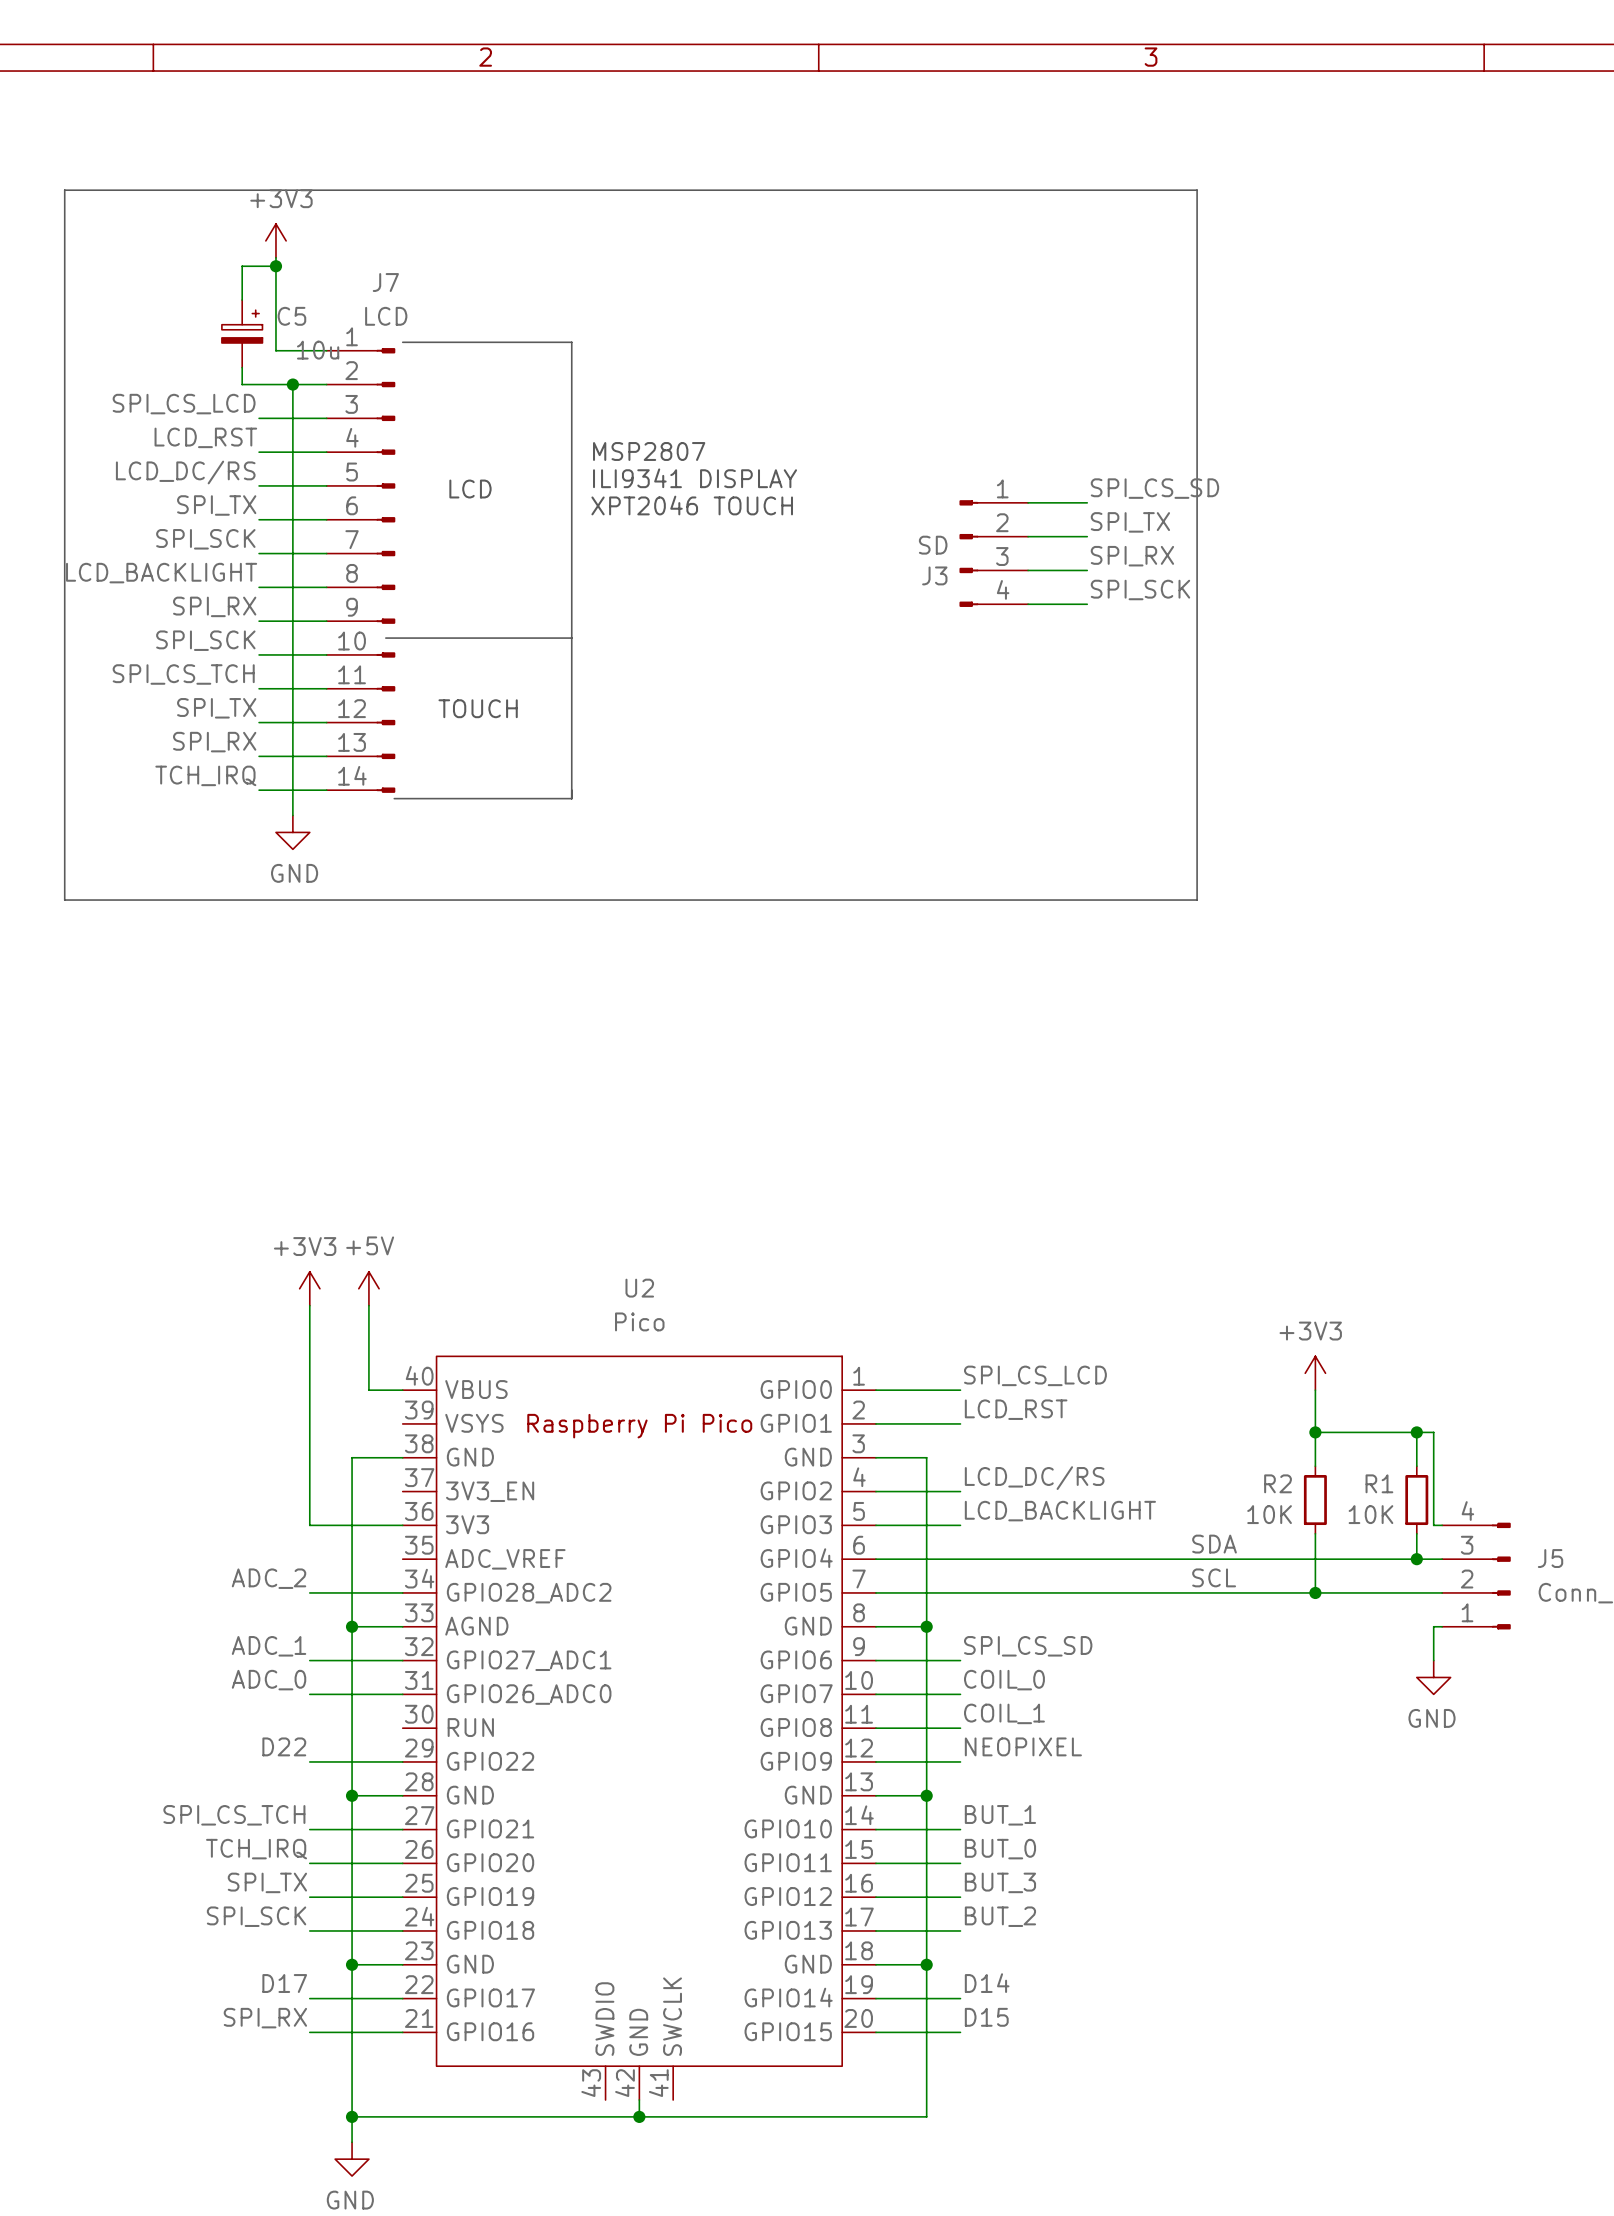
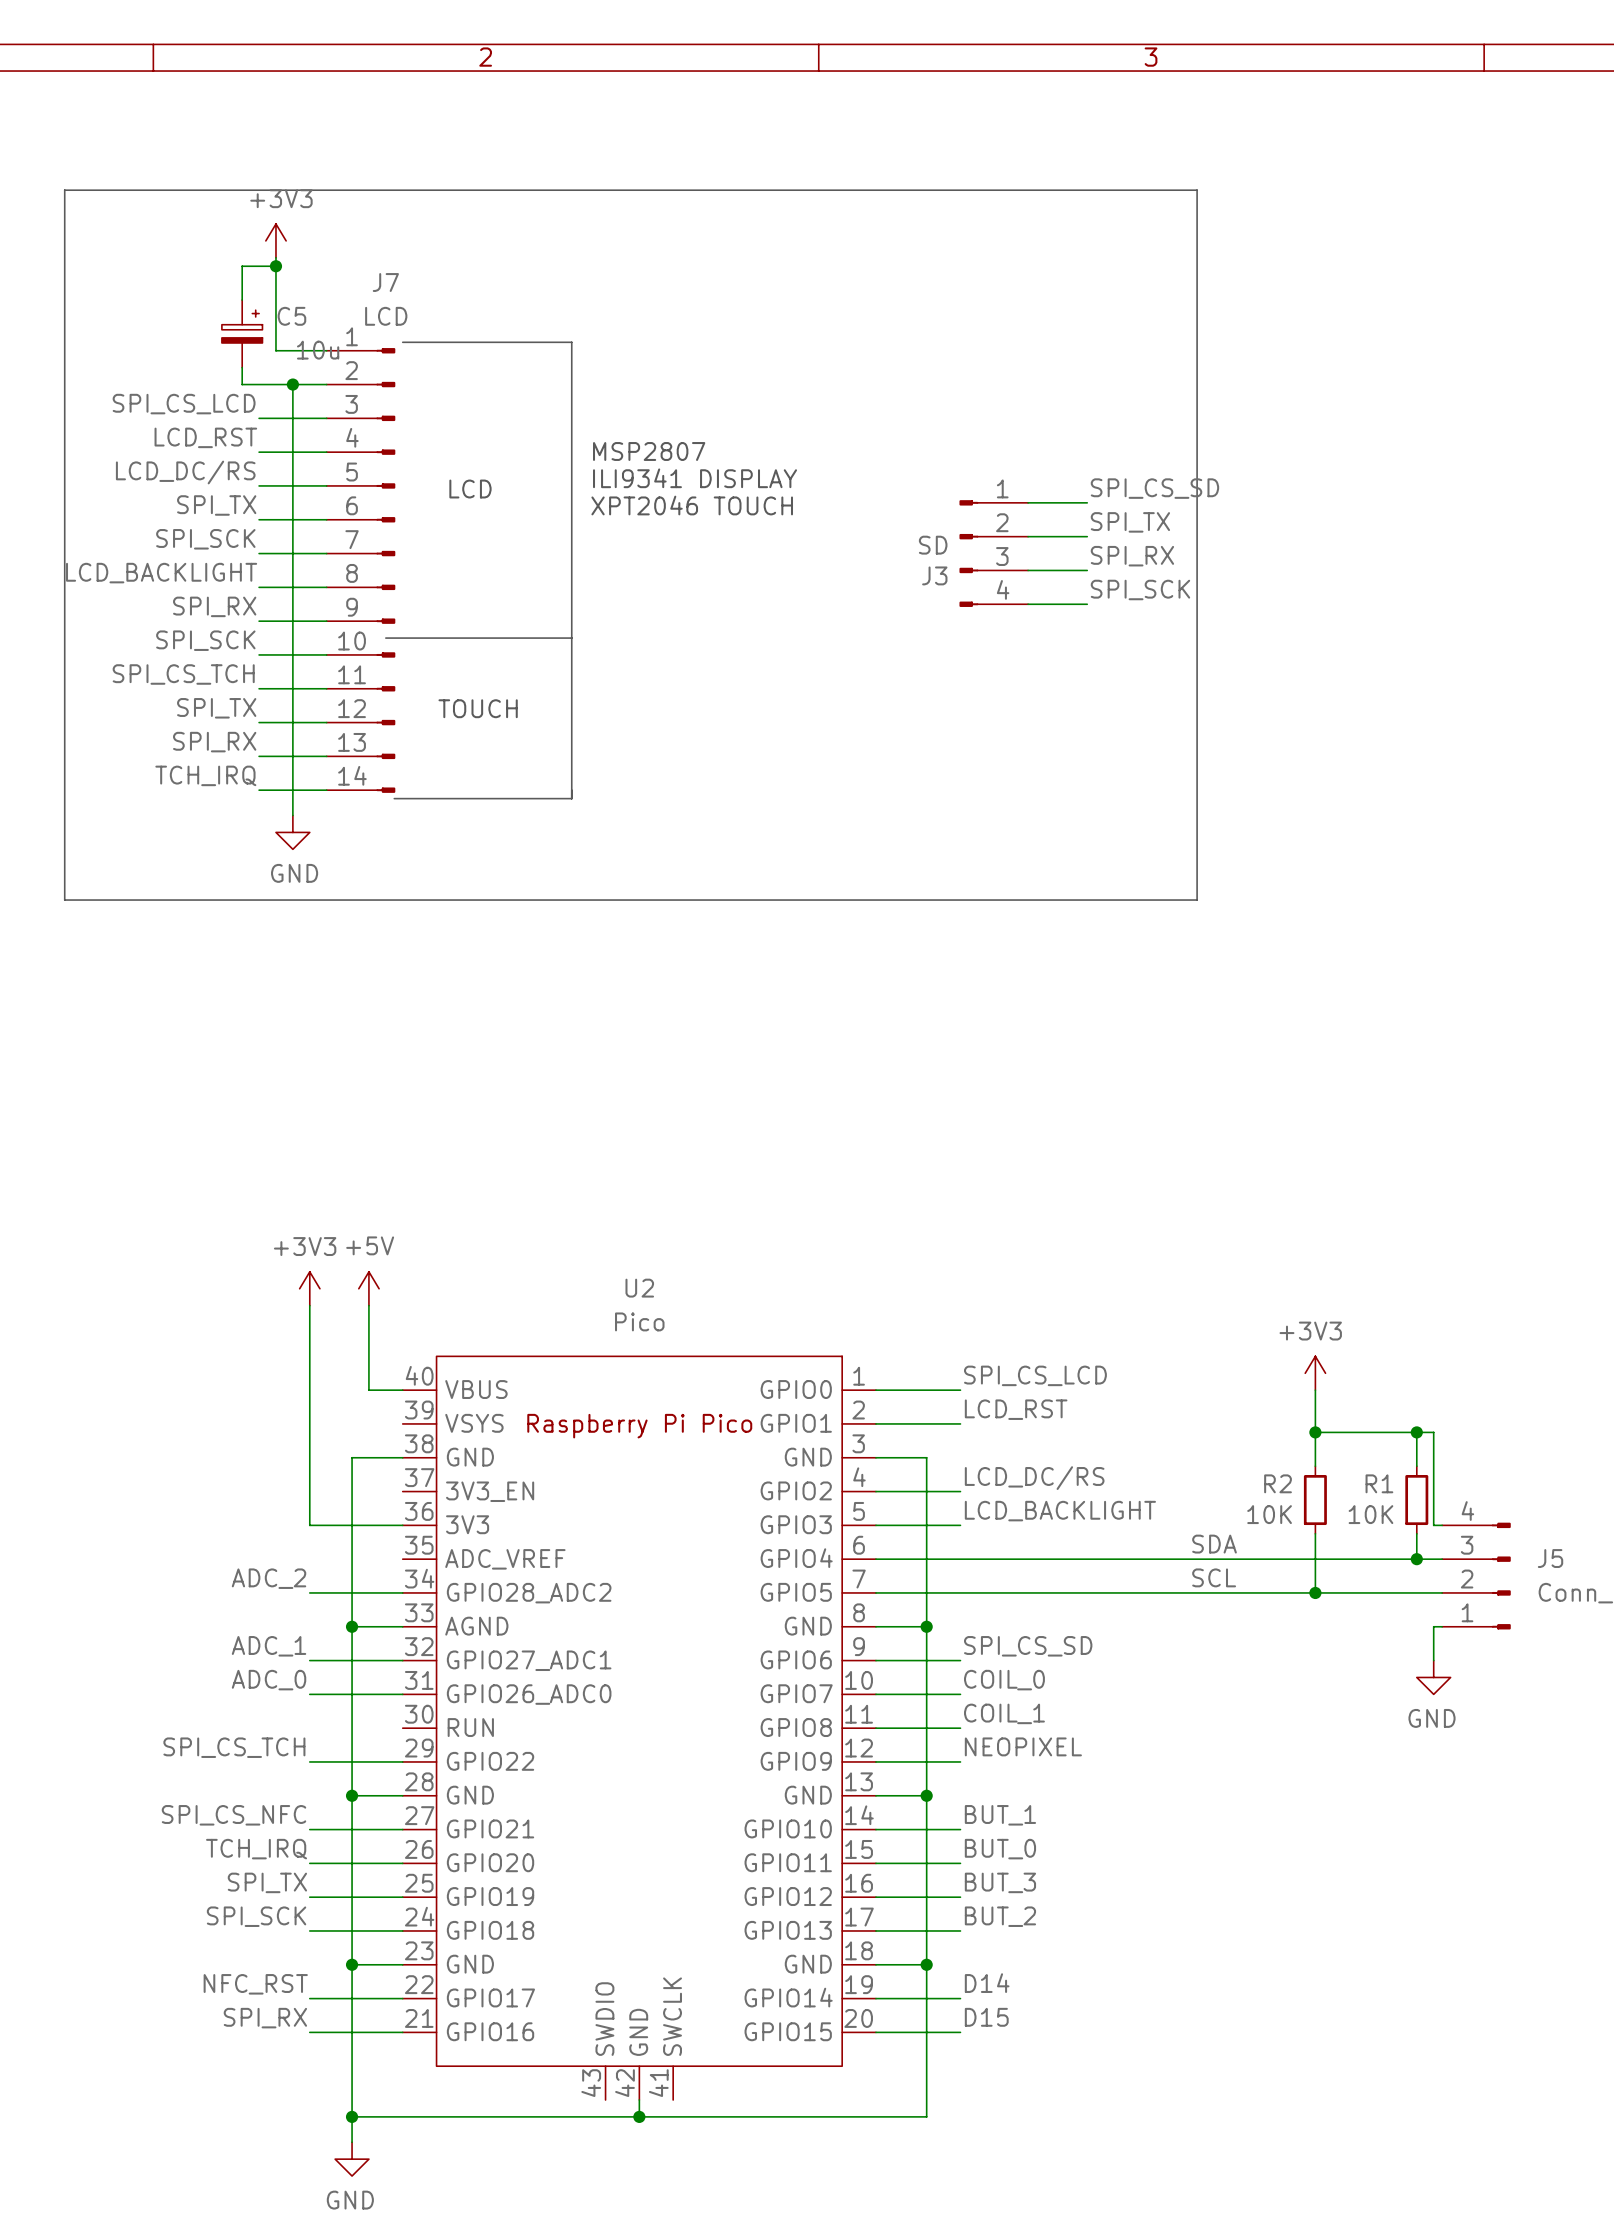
label: D22 (284, 1746) -> SPI_CS_TCH (234, 1747)
label: SPI_CS_TCH (234, 1815) -> SPI_CS_NFC (234, 1815)
label: D17 (284, 1983) -> NFC_RST (255, 1984)

